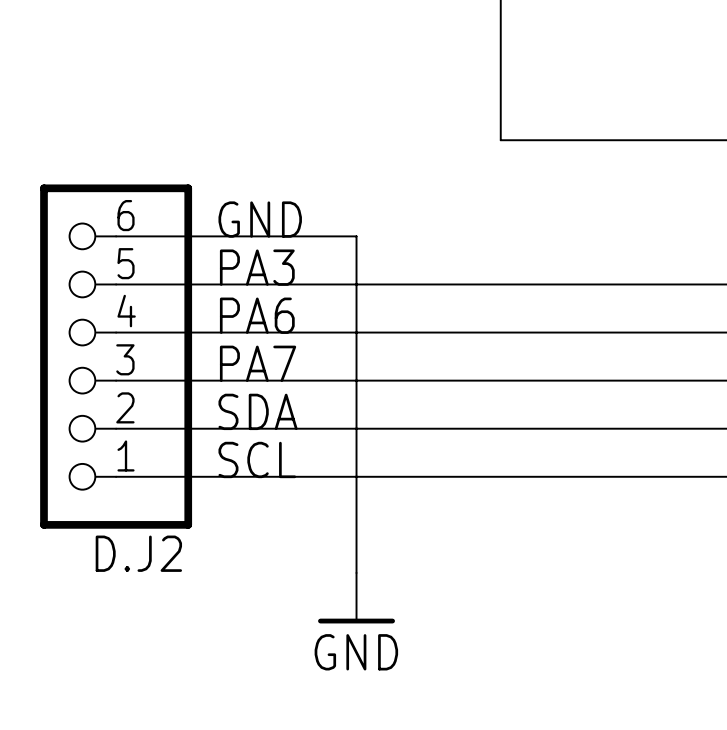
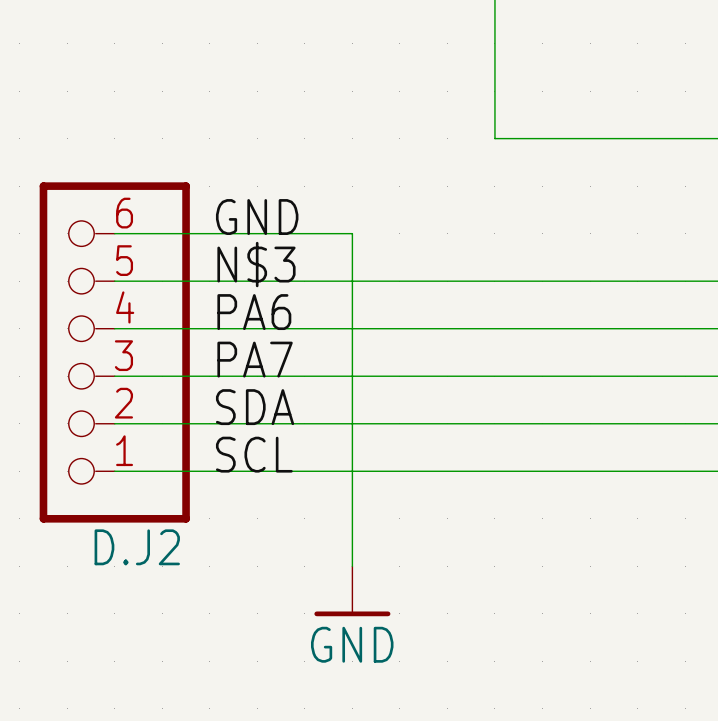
label: PA3 (257, 267) -> N$3 (256, 264)

